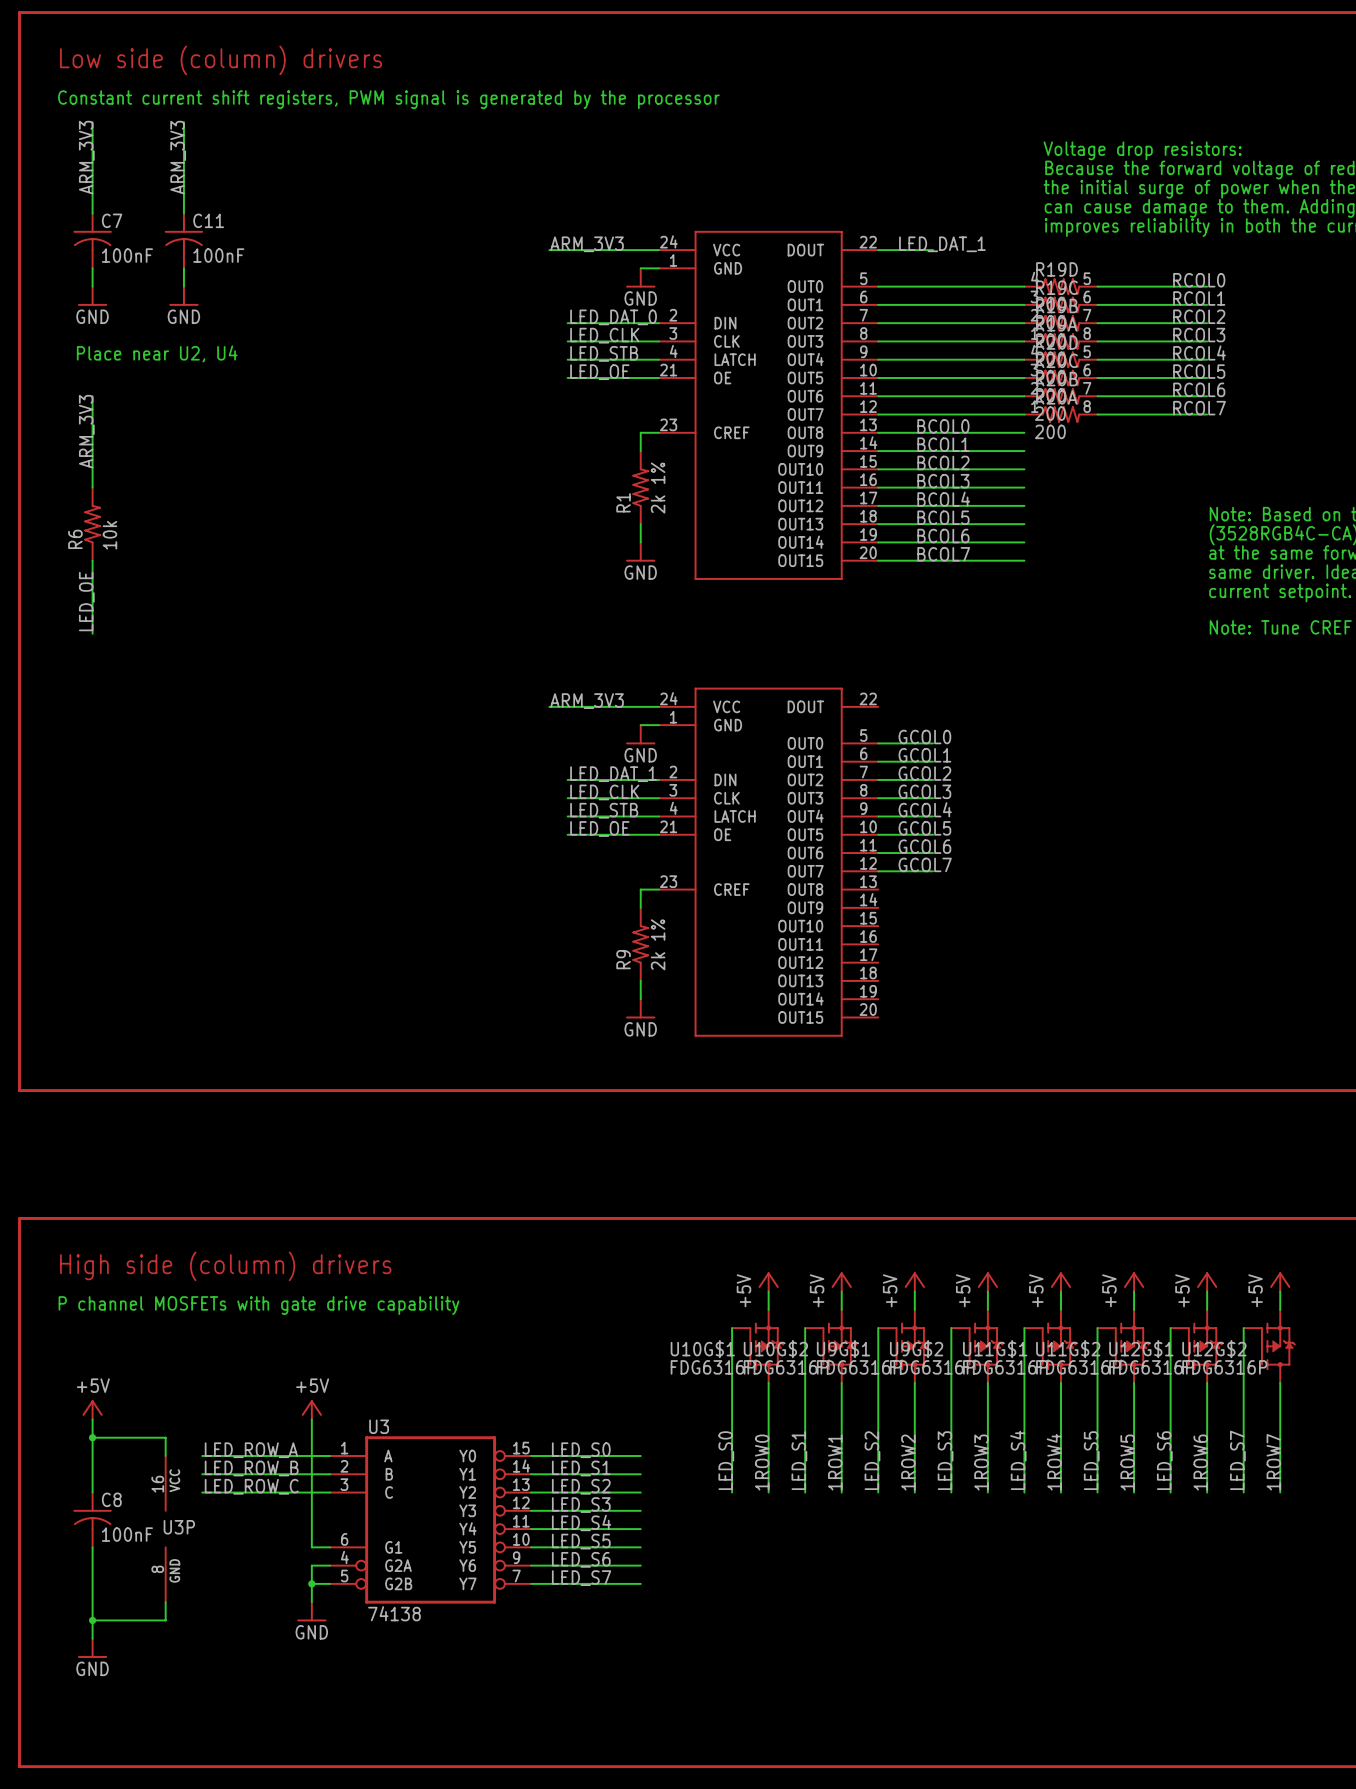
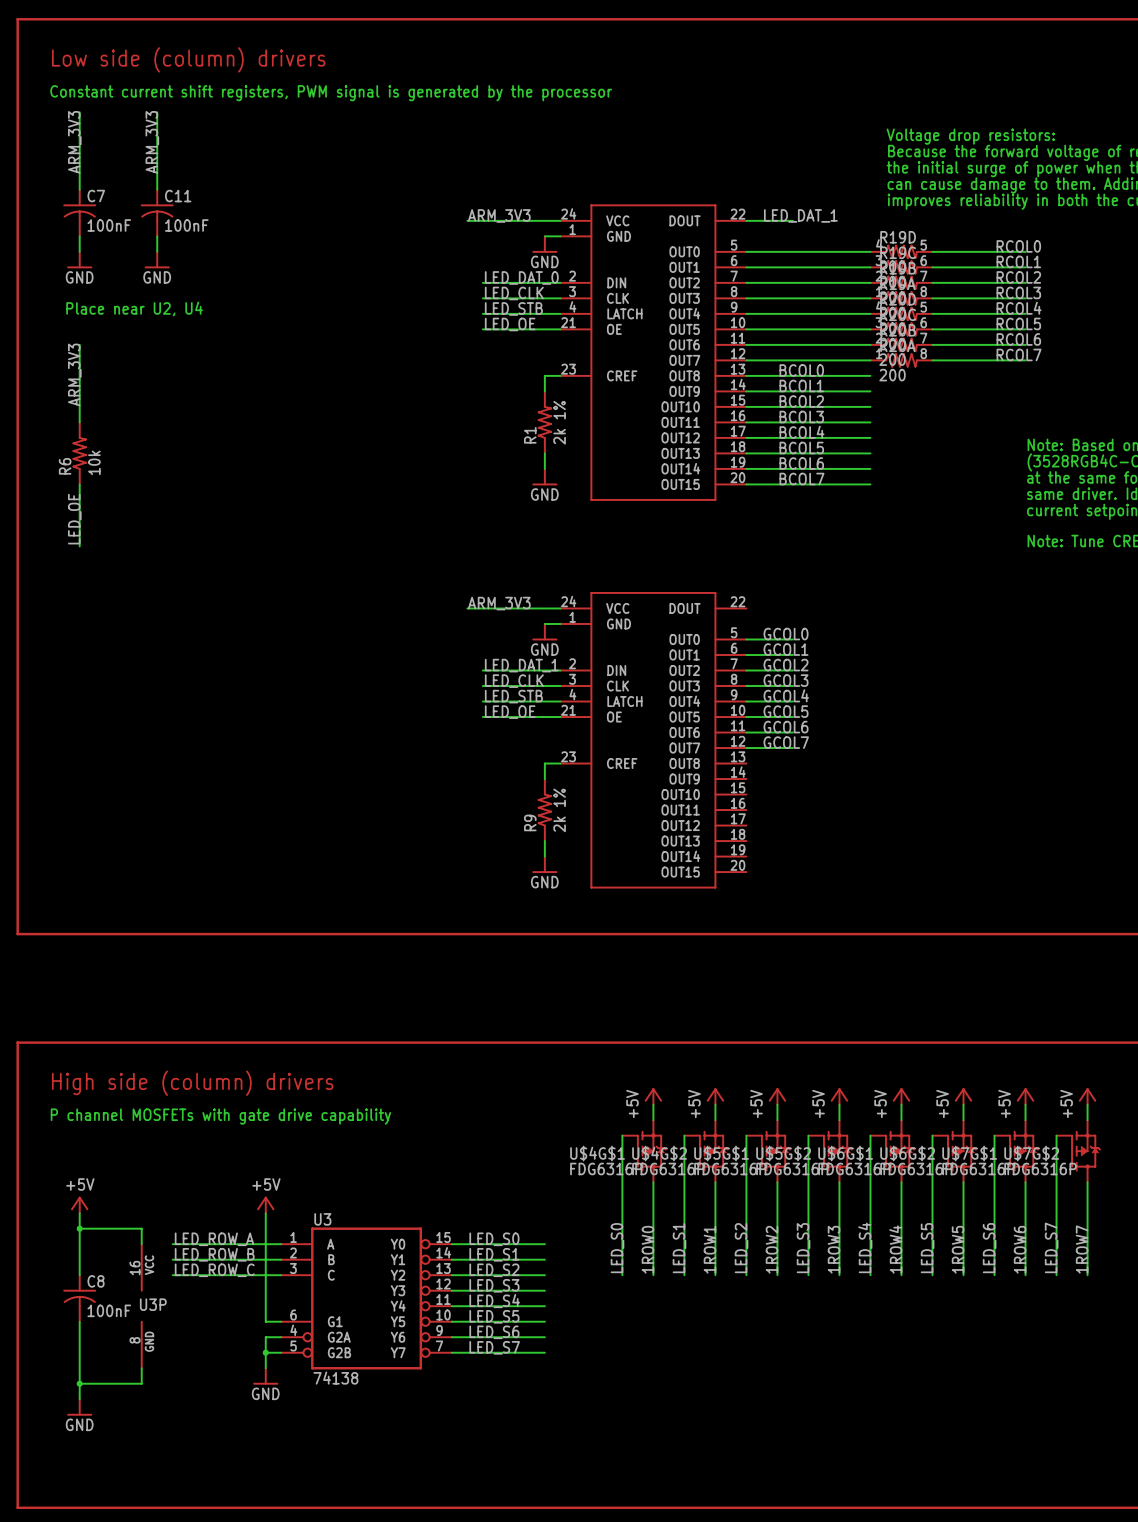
U10G$1 name: U10G$1 (702, 1349) -> U$4G$1 (597, 1153)
U10G$2 name: U10G$2 (775, 1349) -> U$4G$2 (659, 1153)
U9G$1 name: U9G$1 (843, 1349) -> U$5G$1 (721, 1153)
U9G$2 name: U9G$2 (916, 1349) -> U$5G$2 (783, 1153)
U11G$1 name: U11G$1 (995, 1349) -> U$6G$1 (845, 1153)
U11G$2 name: U11G$2 (1068, 1349) -> U$6G$2 (907, 1153)
U12G$1 name: U12G$1 (1141, 1349) -> U$7G$1 (969, 1153)
U12G$2 name: U12G$2 (1214, 1349) -> U$7G$2 (1031, 1153)

